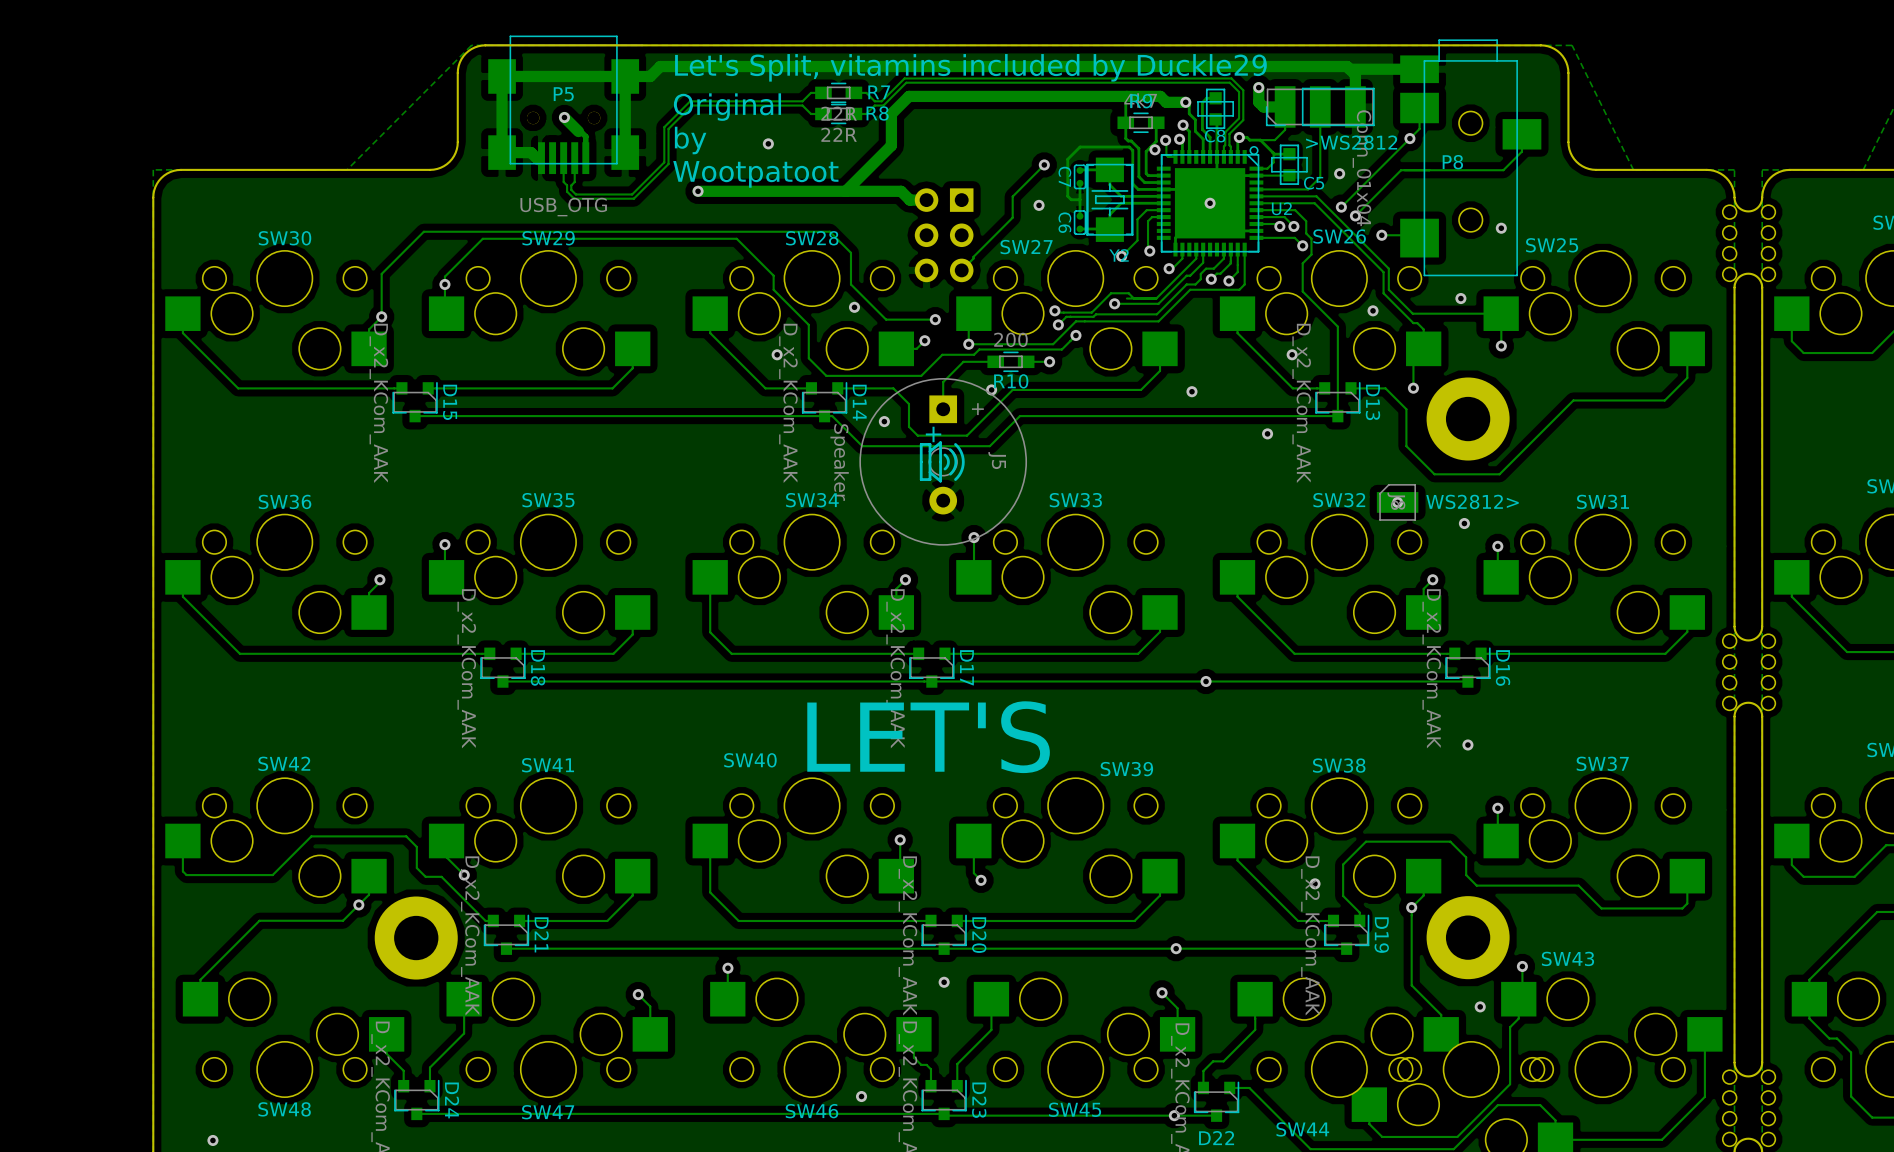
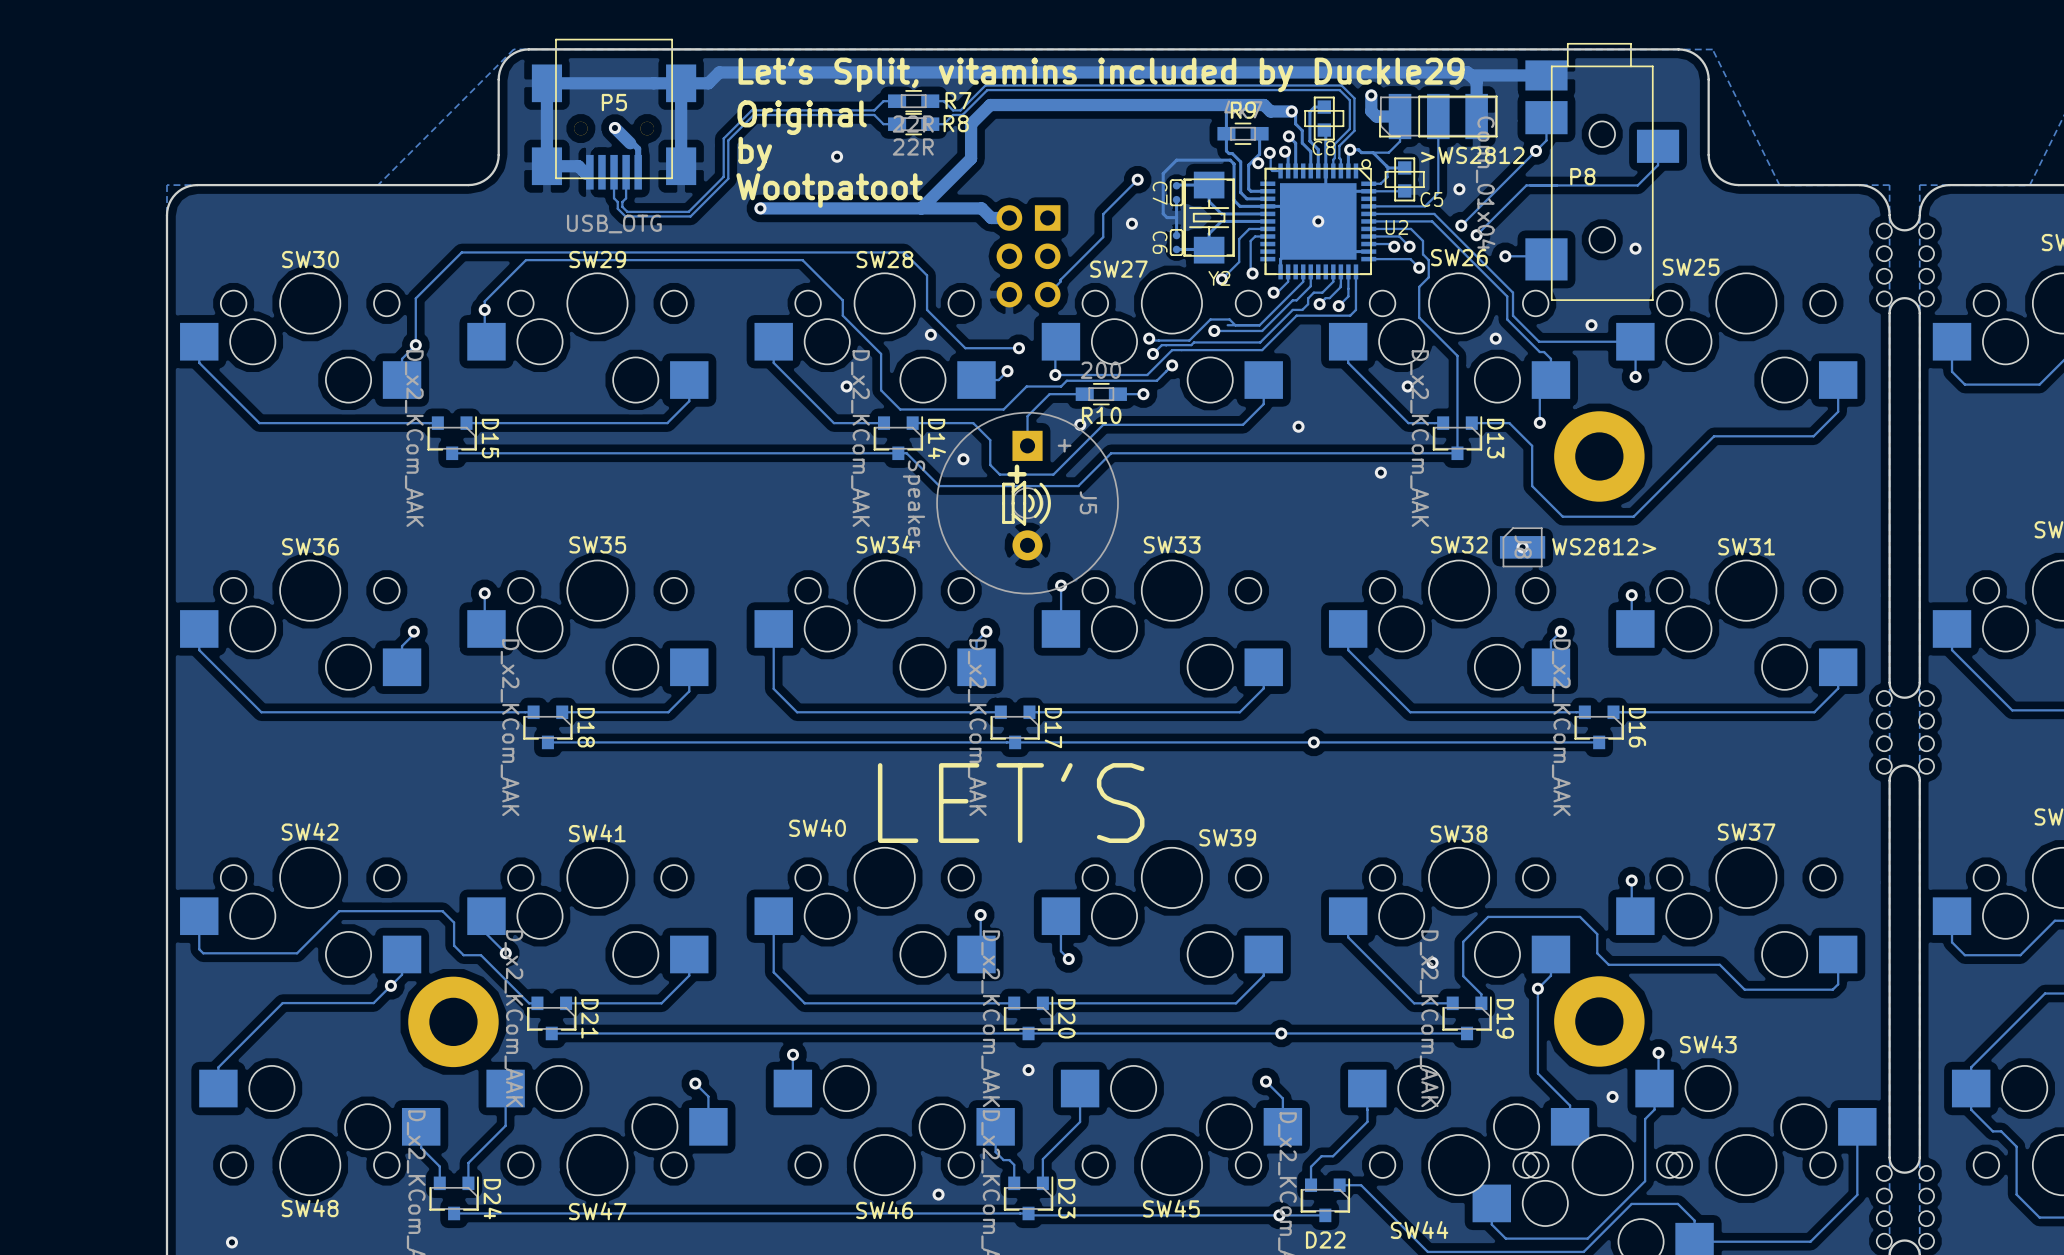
via: (1464, 523) -> none
via: (1467, 744) -> none

